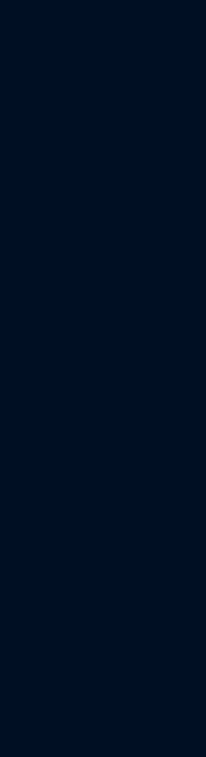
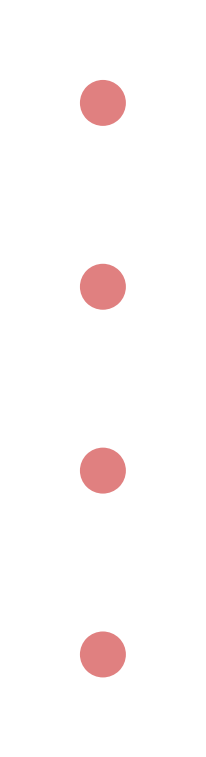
part: none -> (102, 102)
part: none -> (102, 286)
part: none -> (102, 470)
part: none -> (102, 654)

